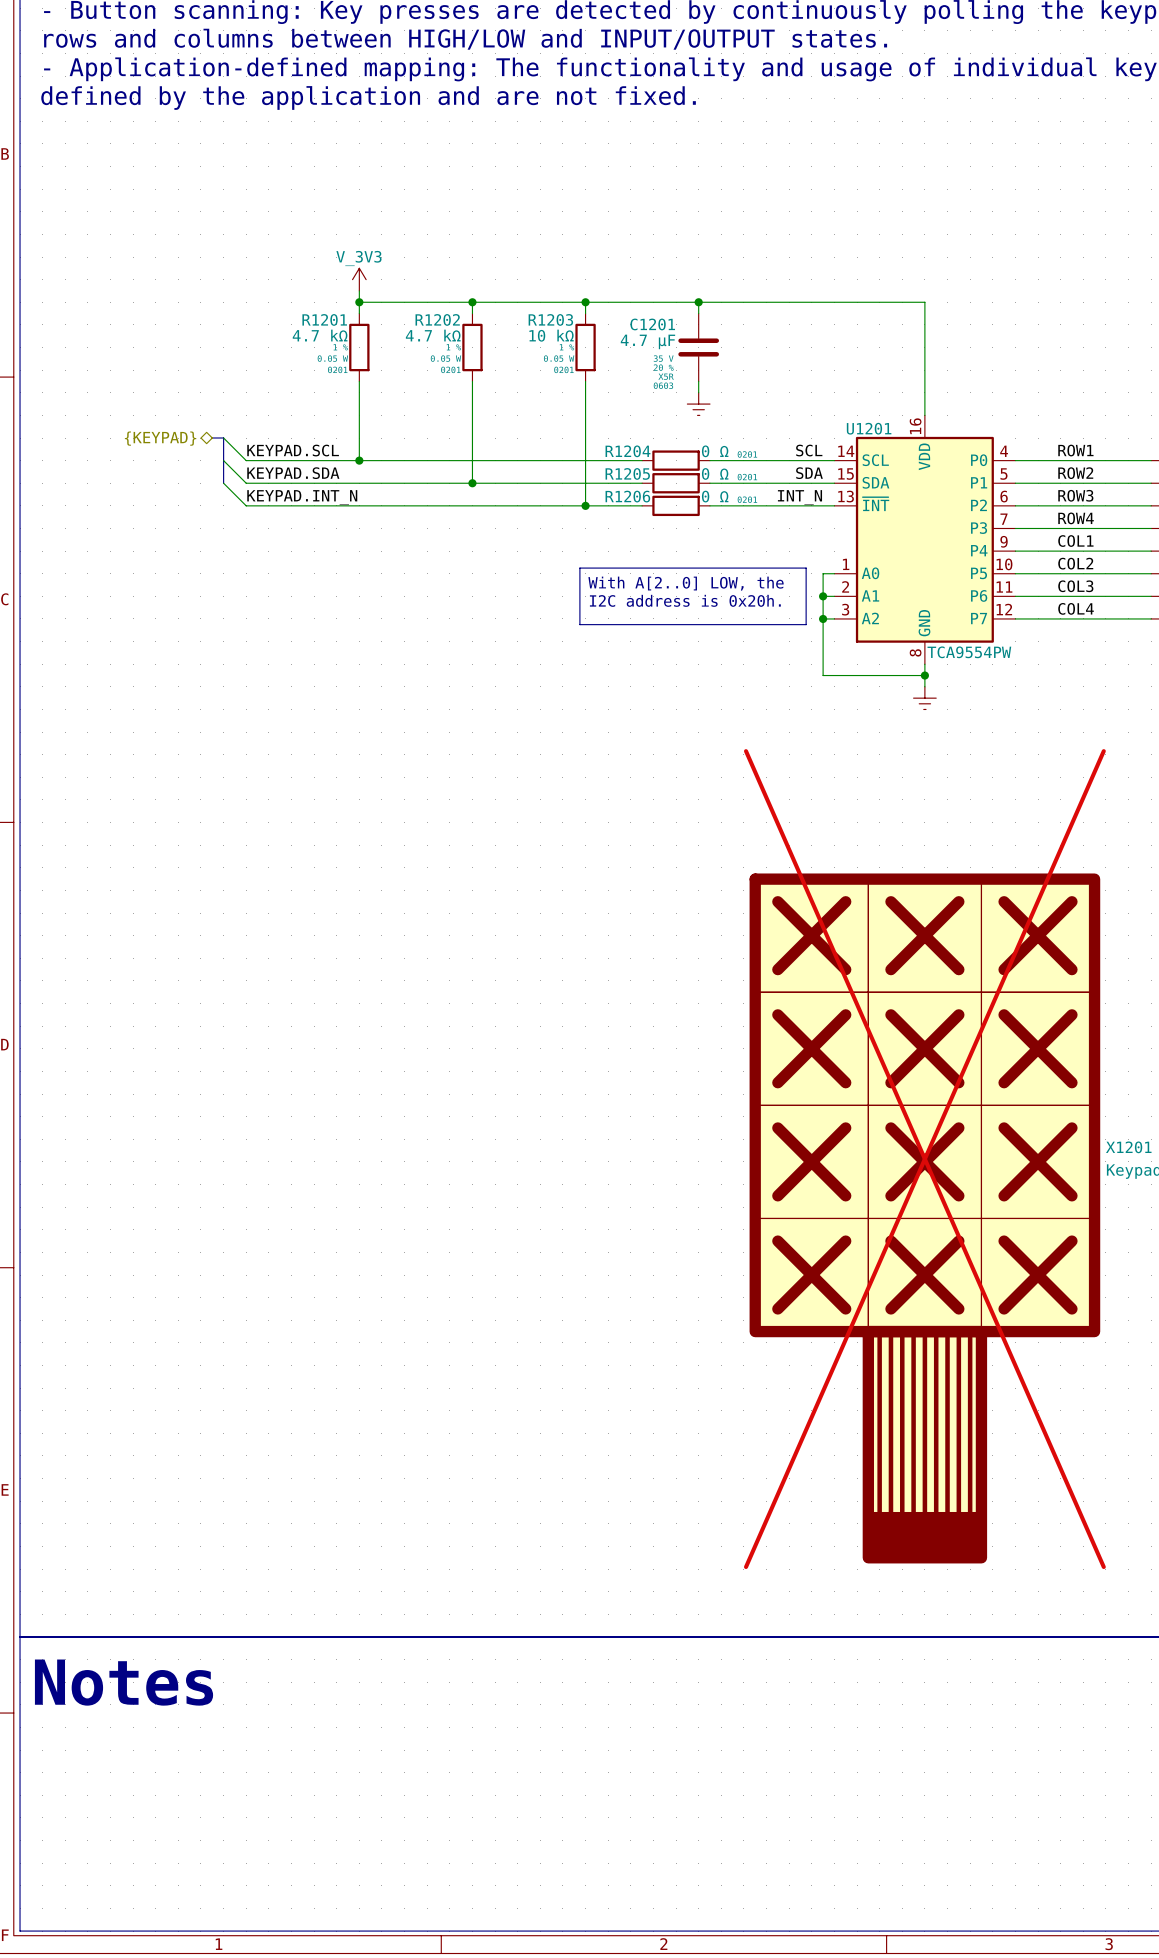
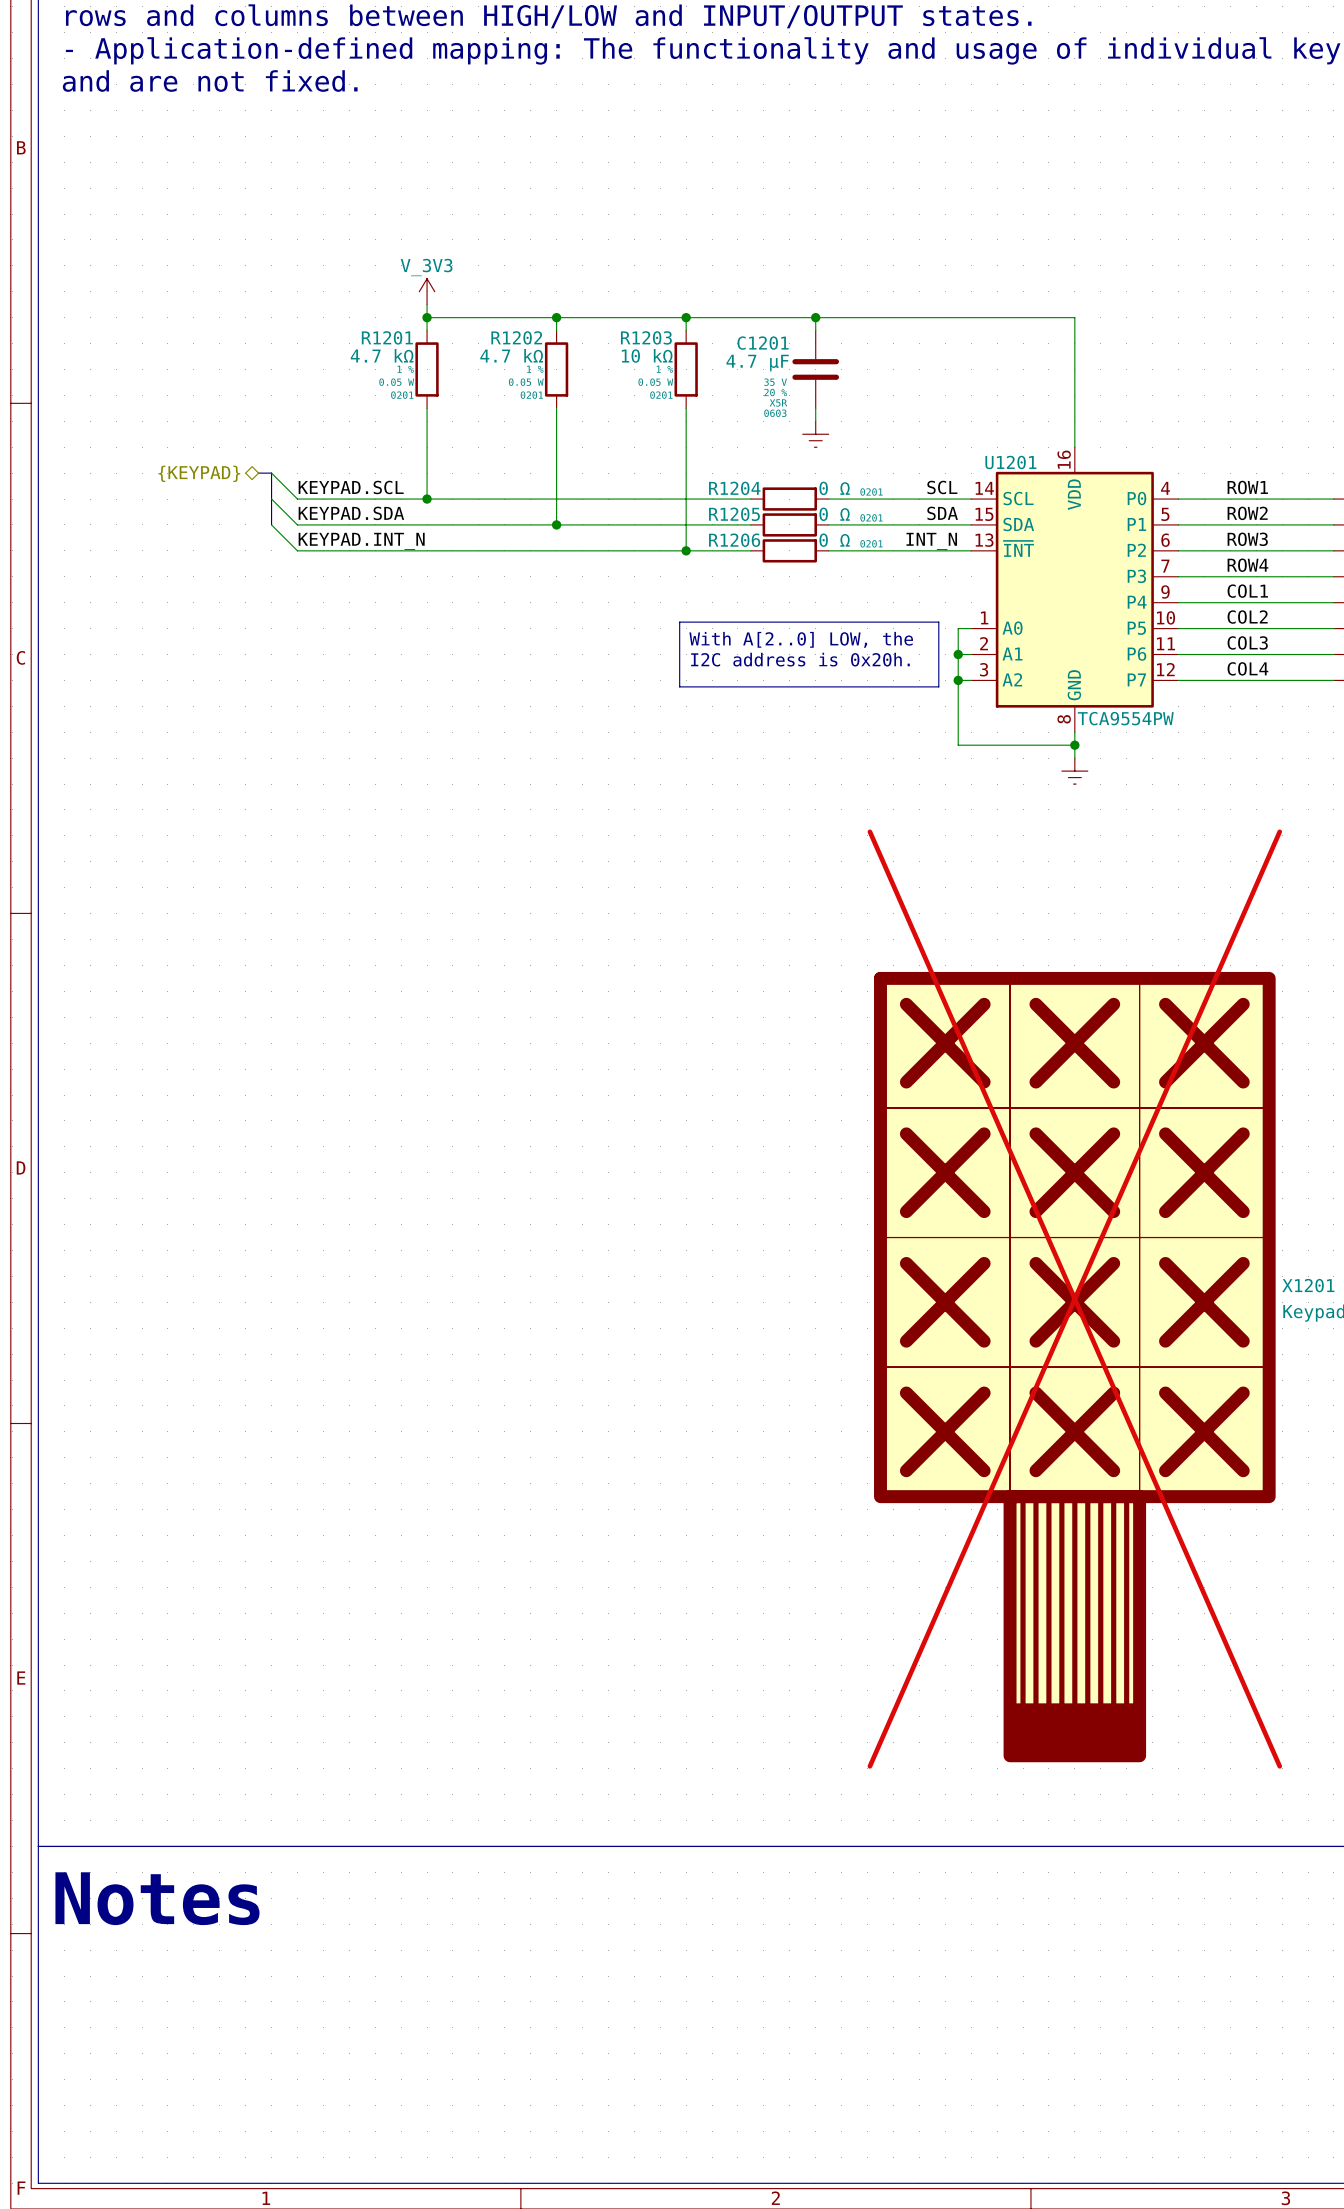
text: defined by the application and are not fixed. (368, 97) -> and are not fixed. (210, 81)

